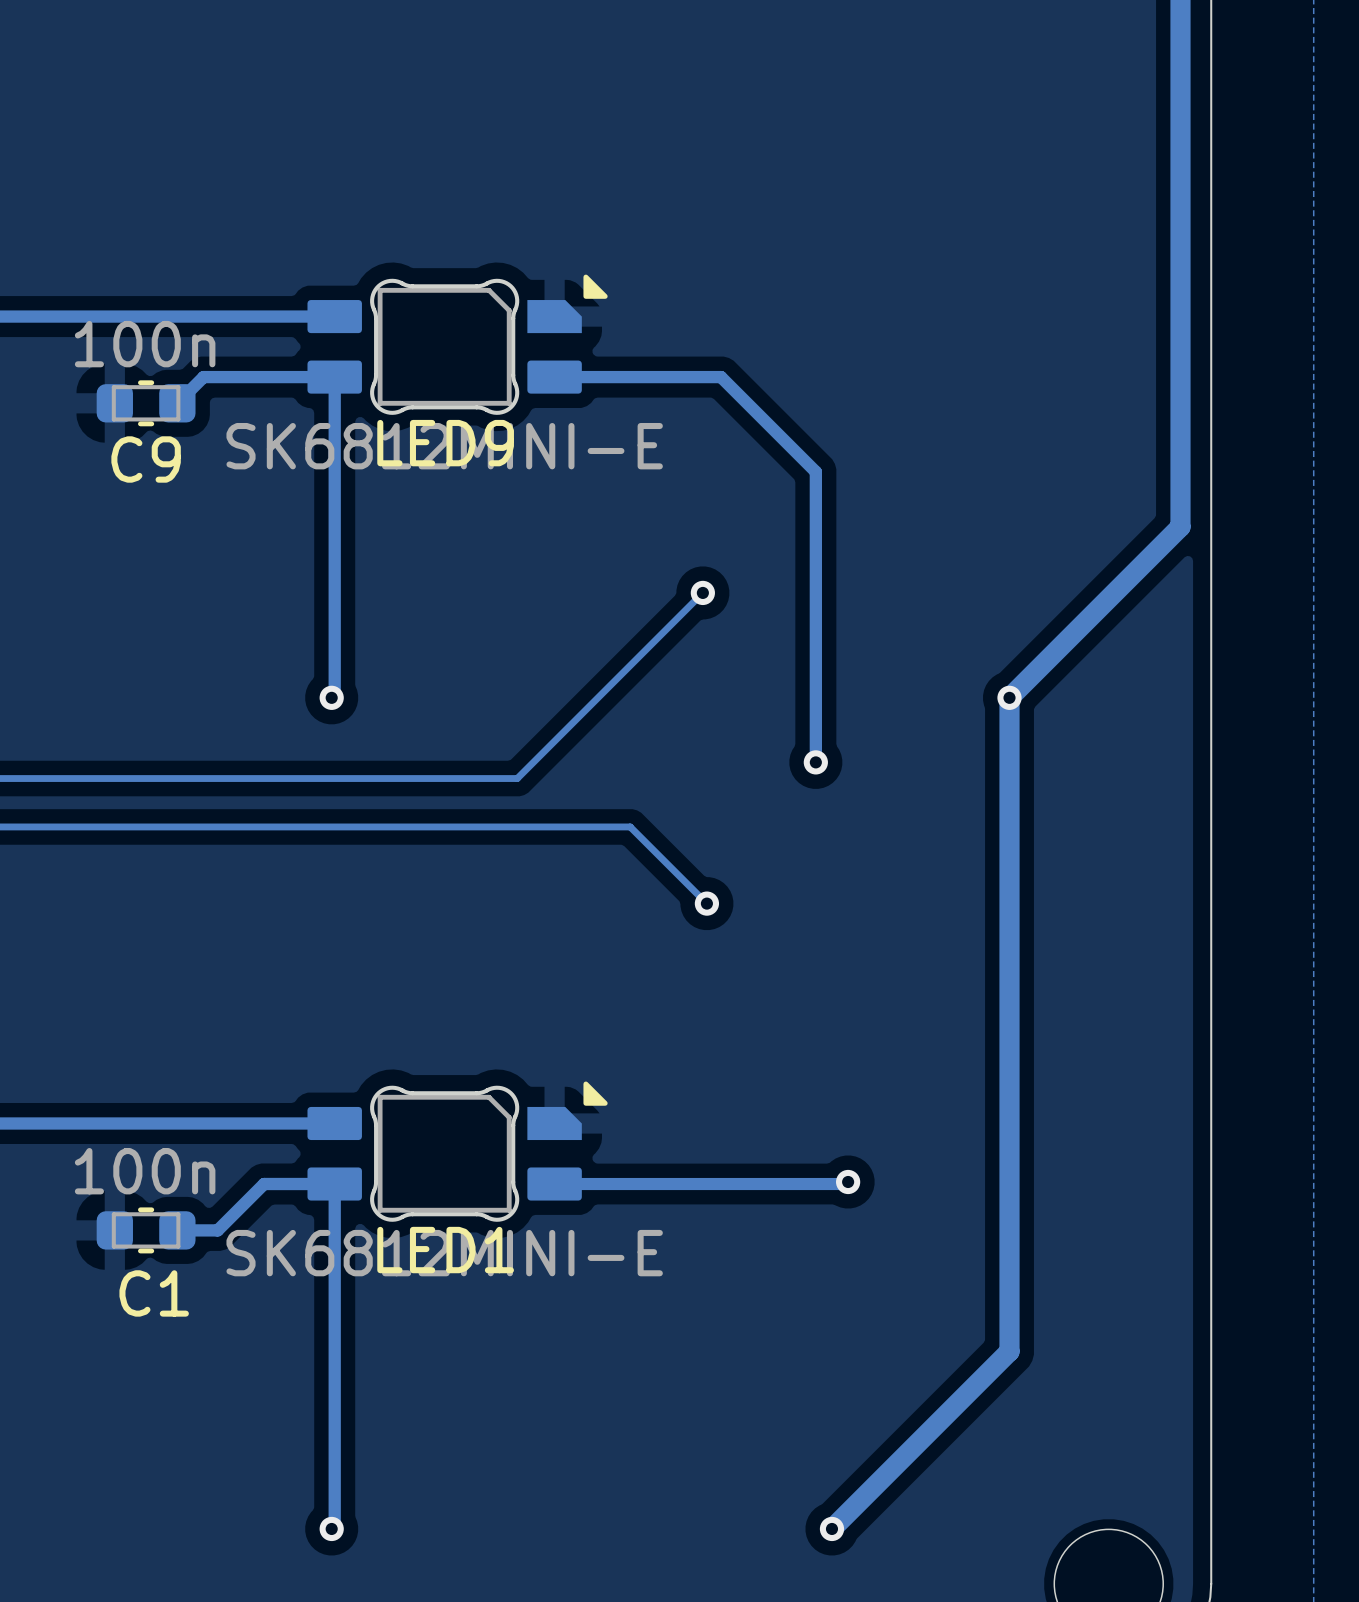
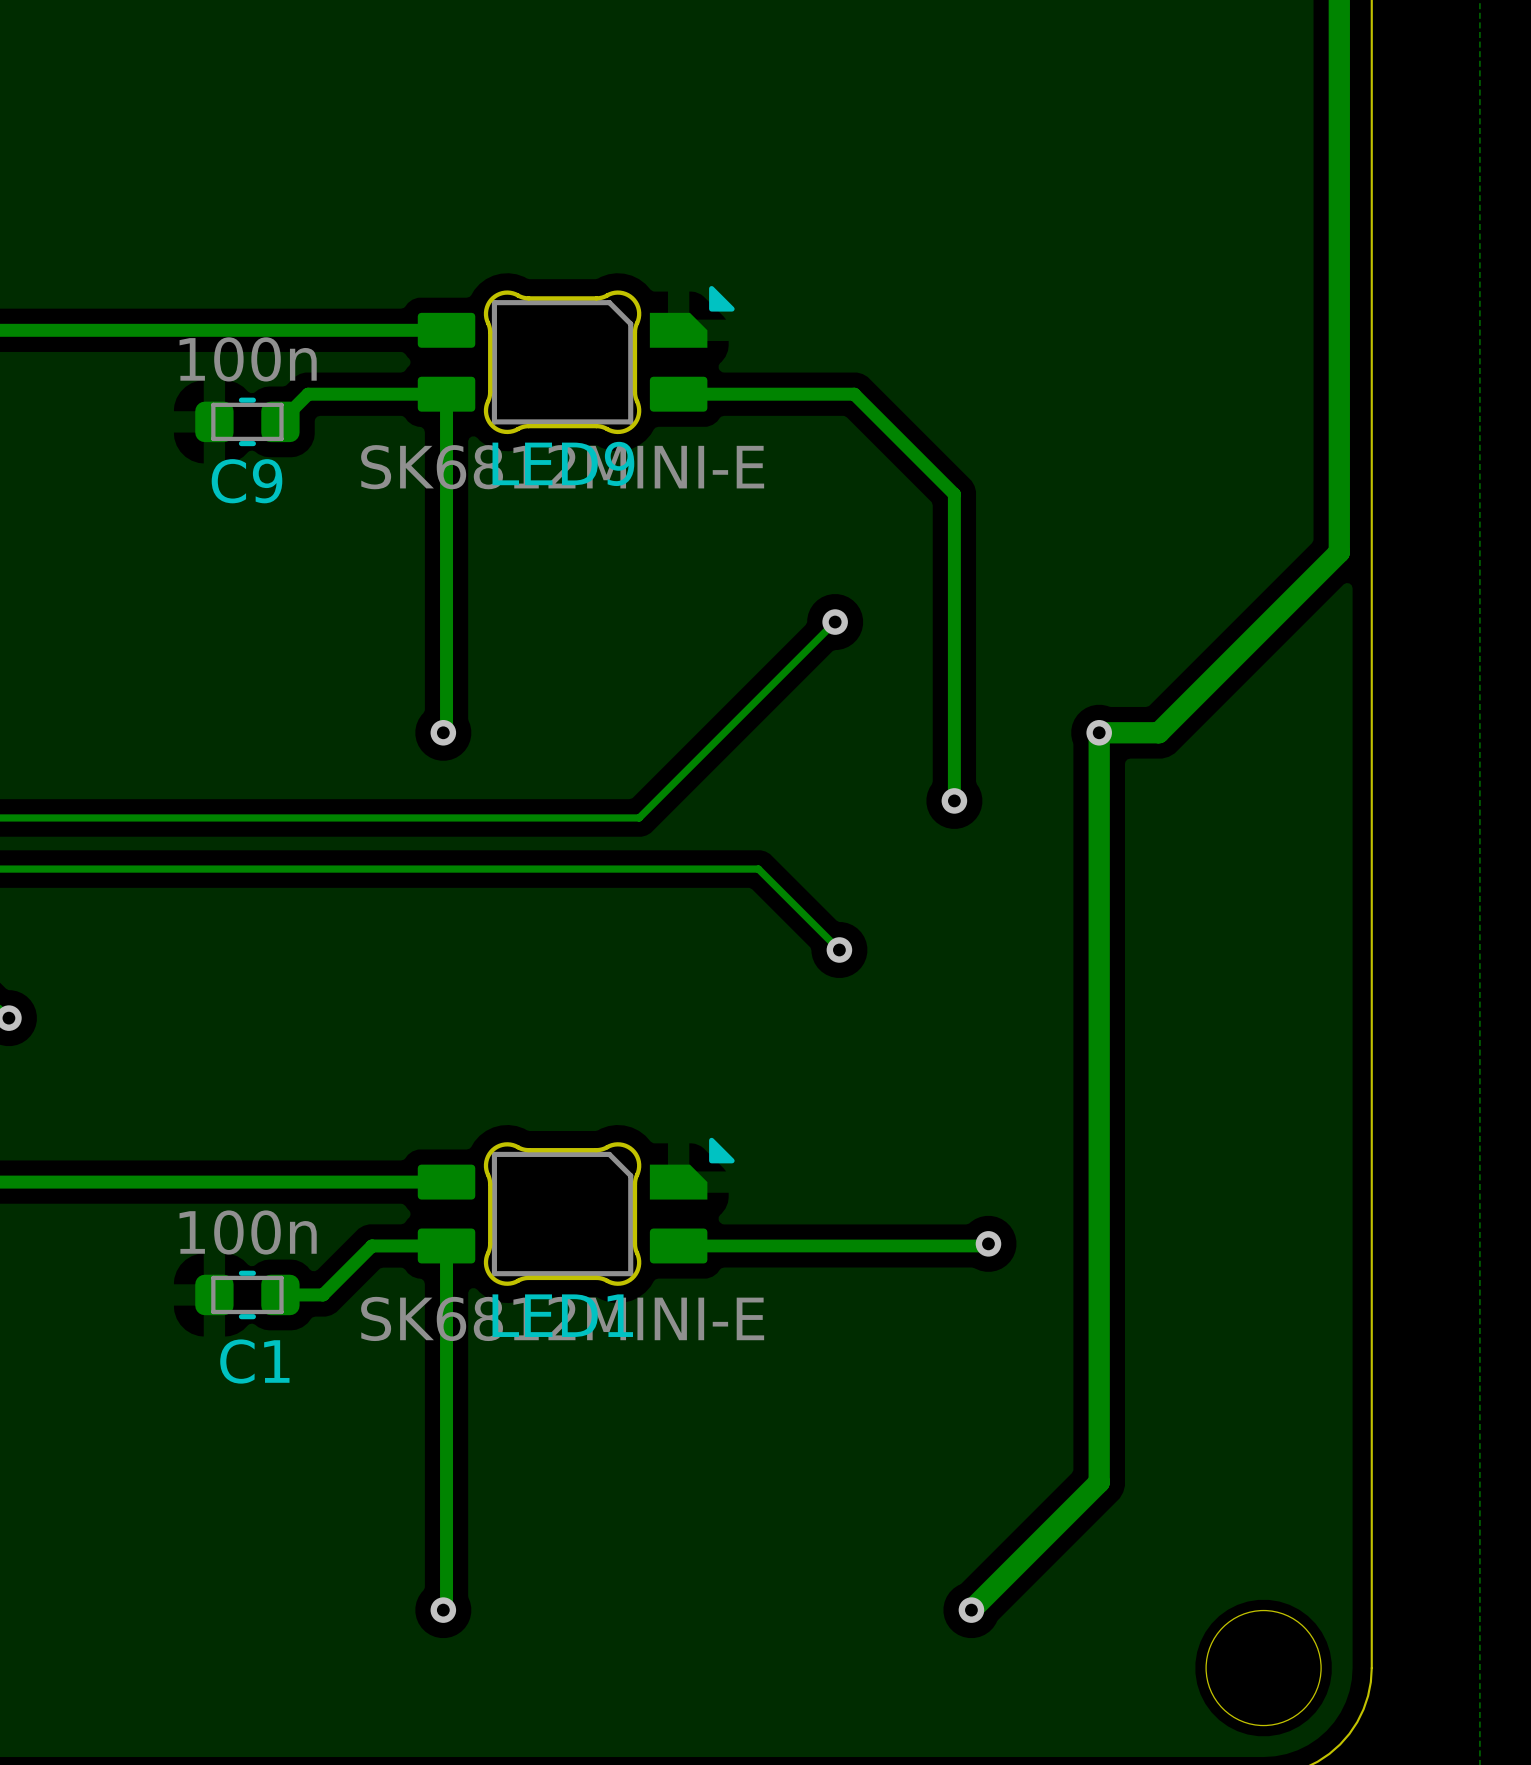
track: (1009, 697) (1009, 1351) (953, 1407) -> (1158, 732) (1099, 732) (1099, 1482)
via position: (1009, 697) -> (1099, 732)

